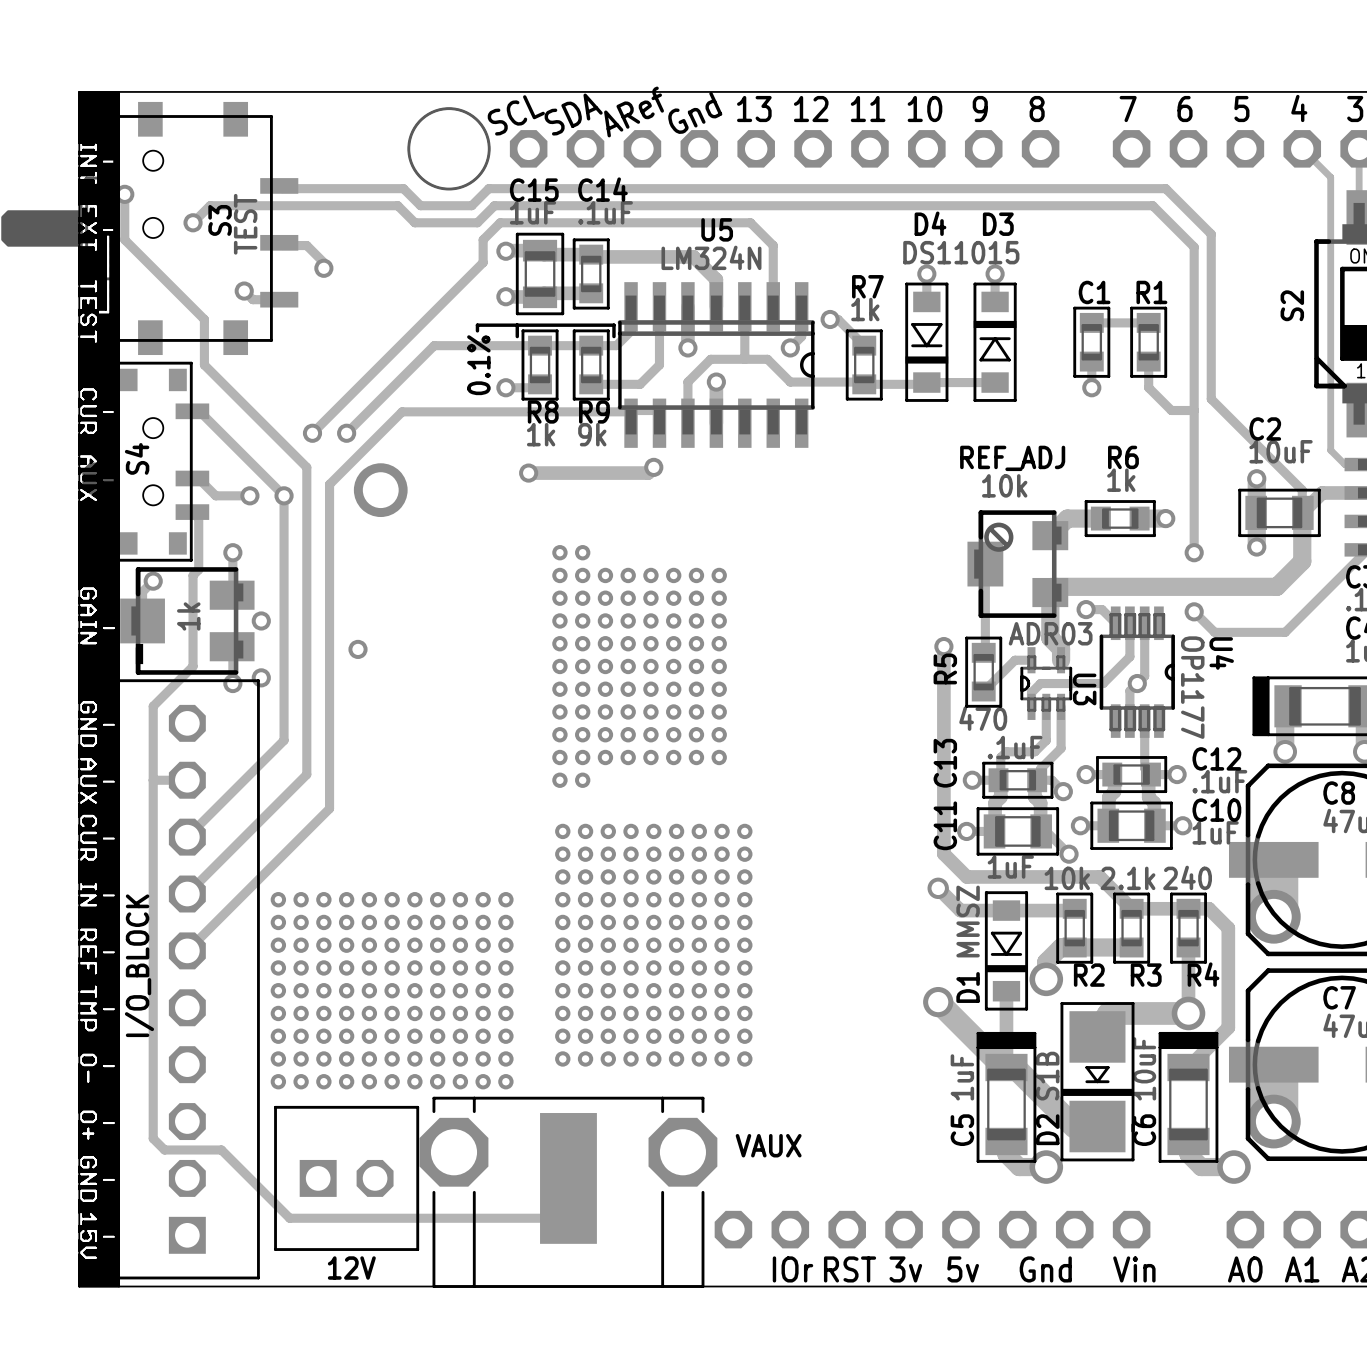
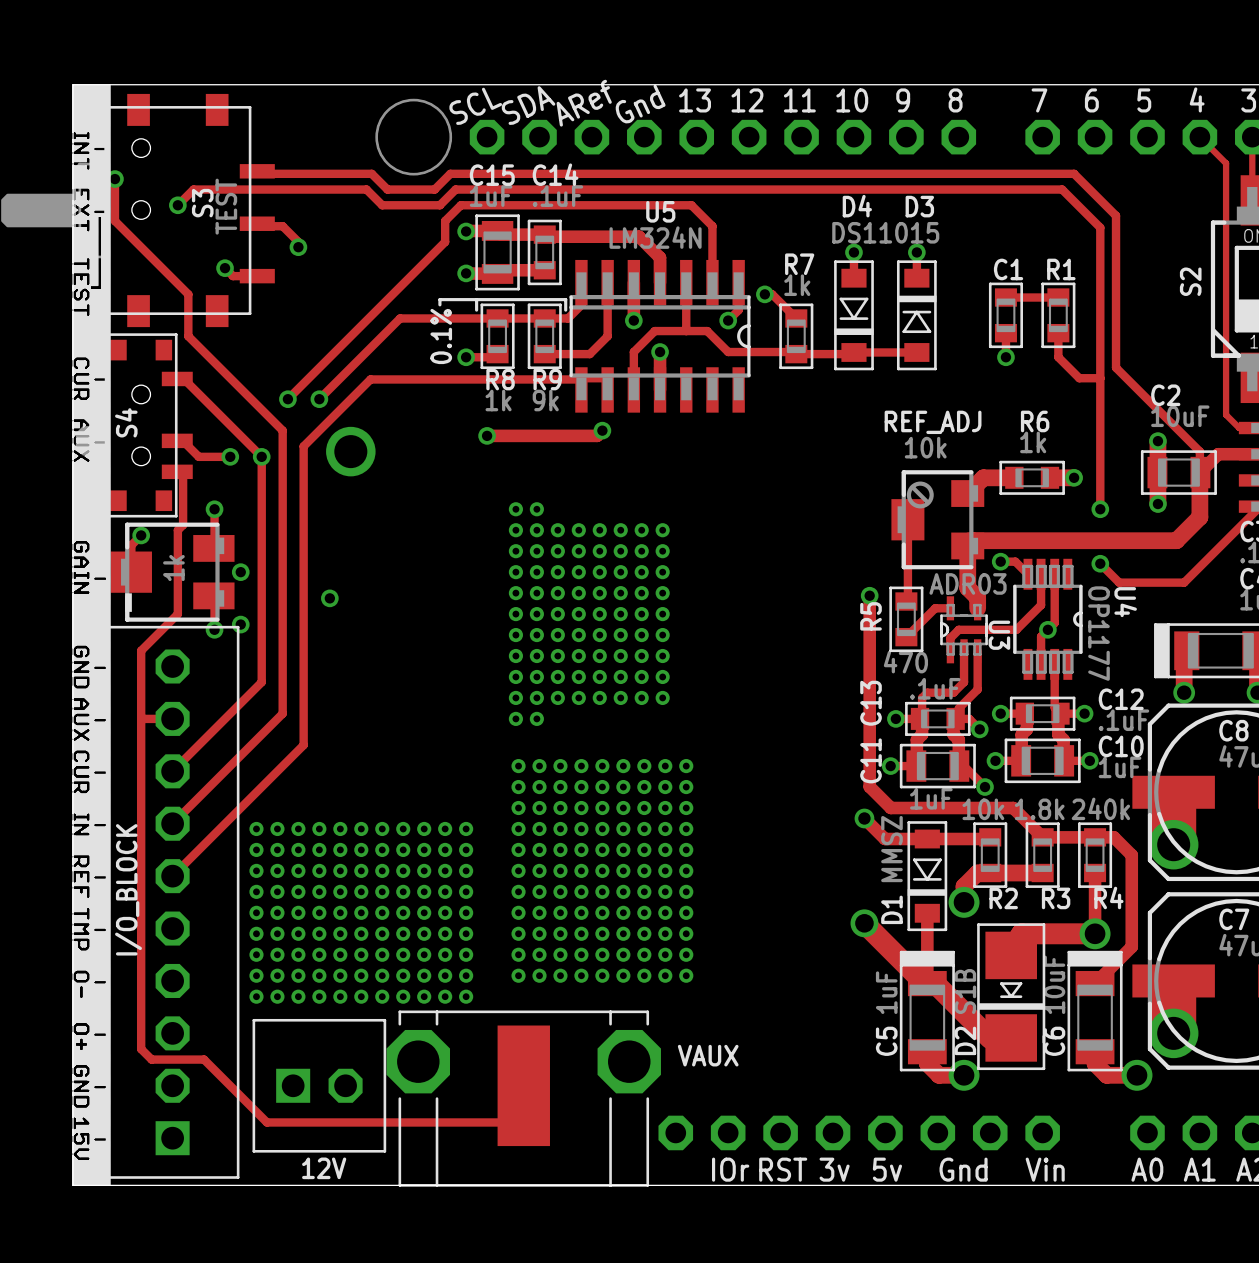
R4 value: 240 (1187, 877) -> 240k (1100, 808)
R3 value: 2.1k (1128, 878) -> 1.8k (1039, 809)

